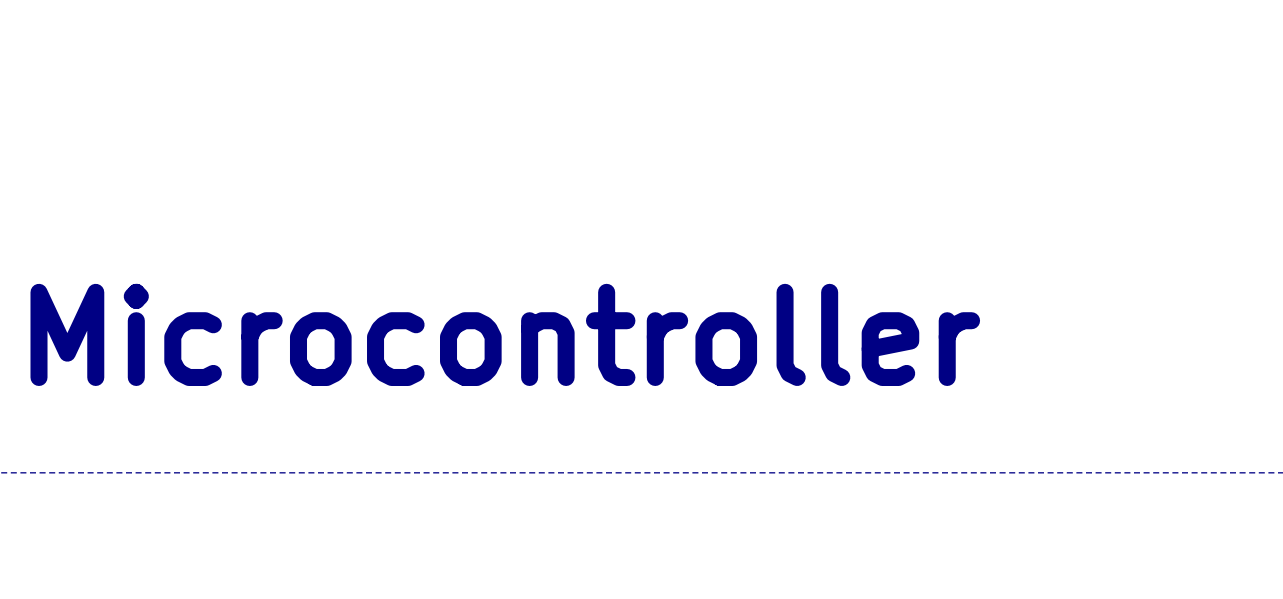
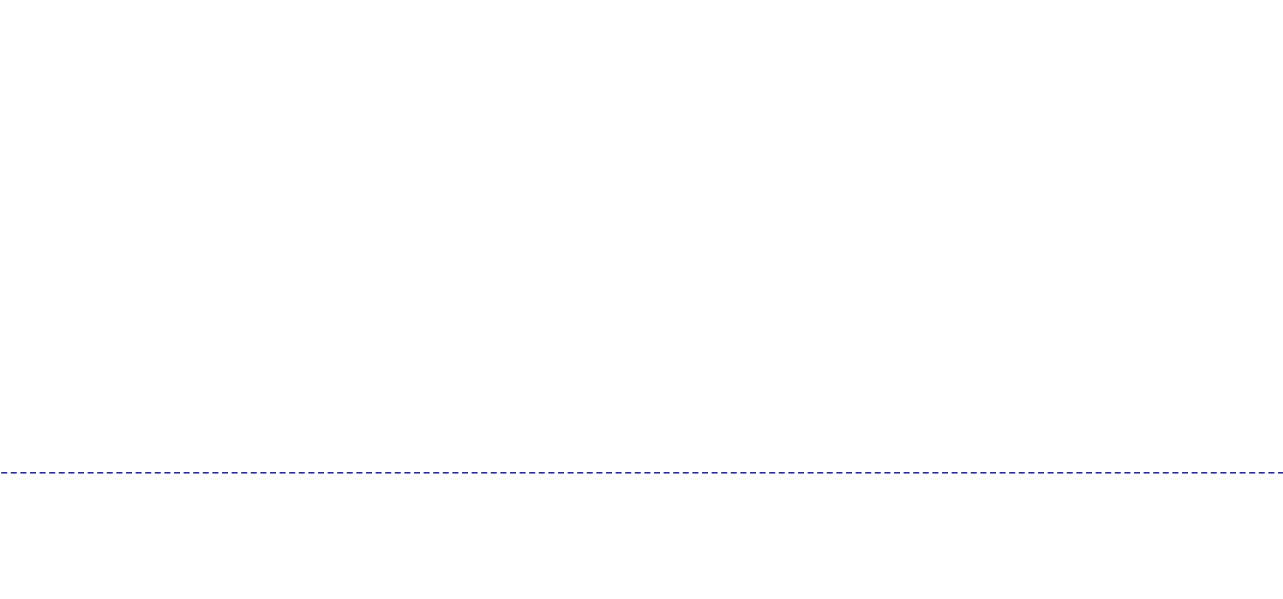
text: Microcontroller (505, 334) -> none

